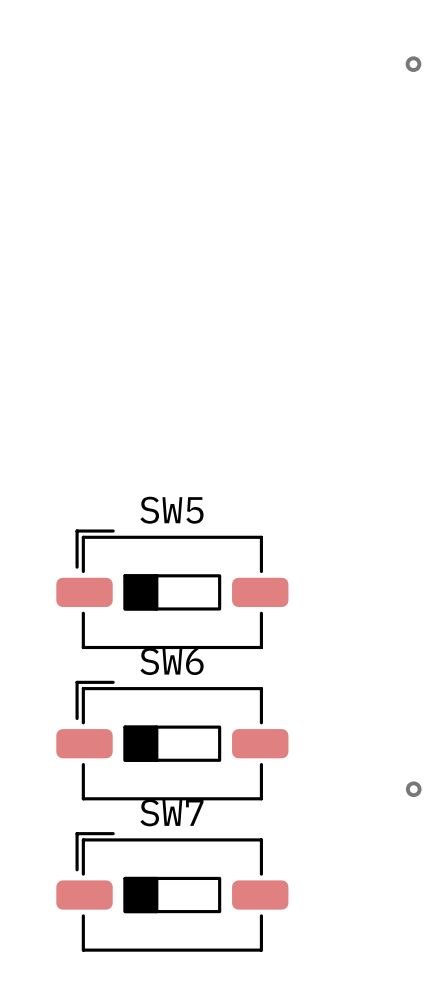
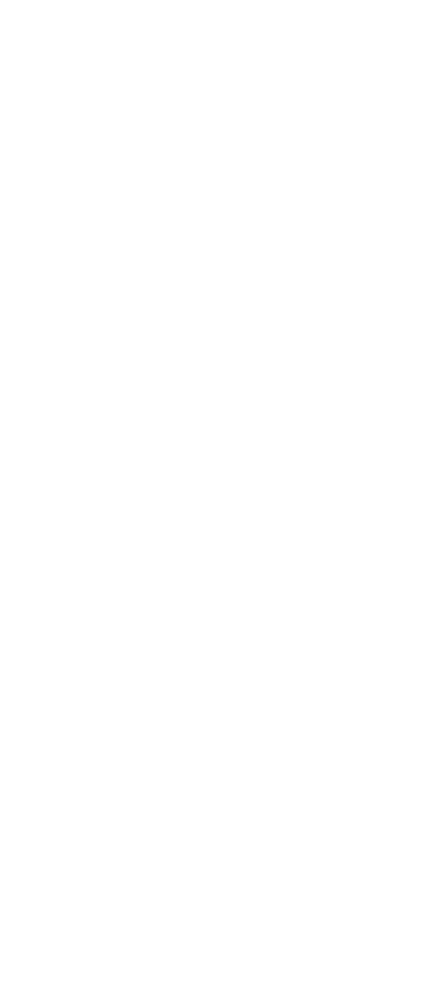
via: (413, 64) -> none
SW5: (172, 589) -> none
SW6: (172, 740) -> none
via: (413, 789) -> none
SW7: (172, 891) -> none

